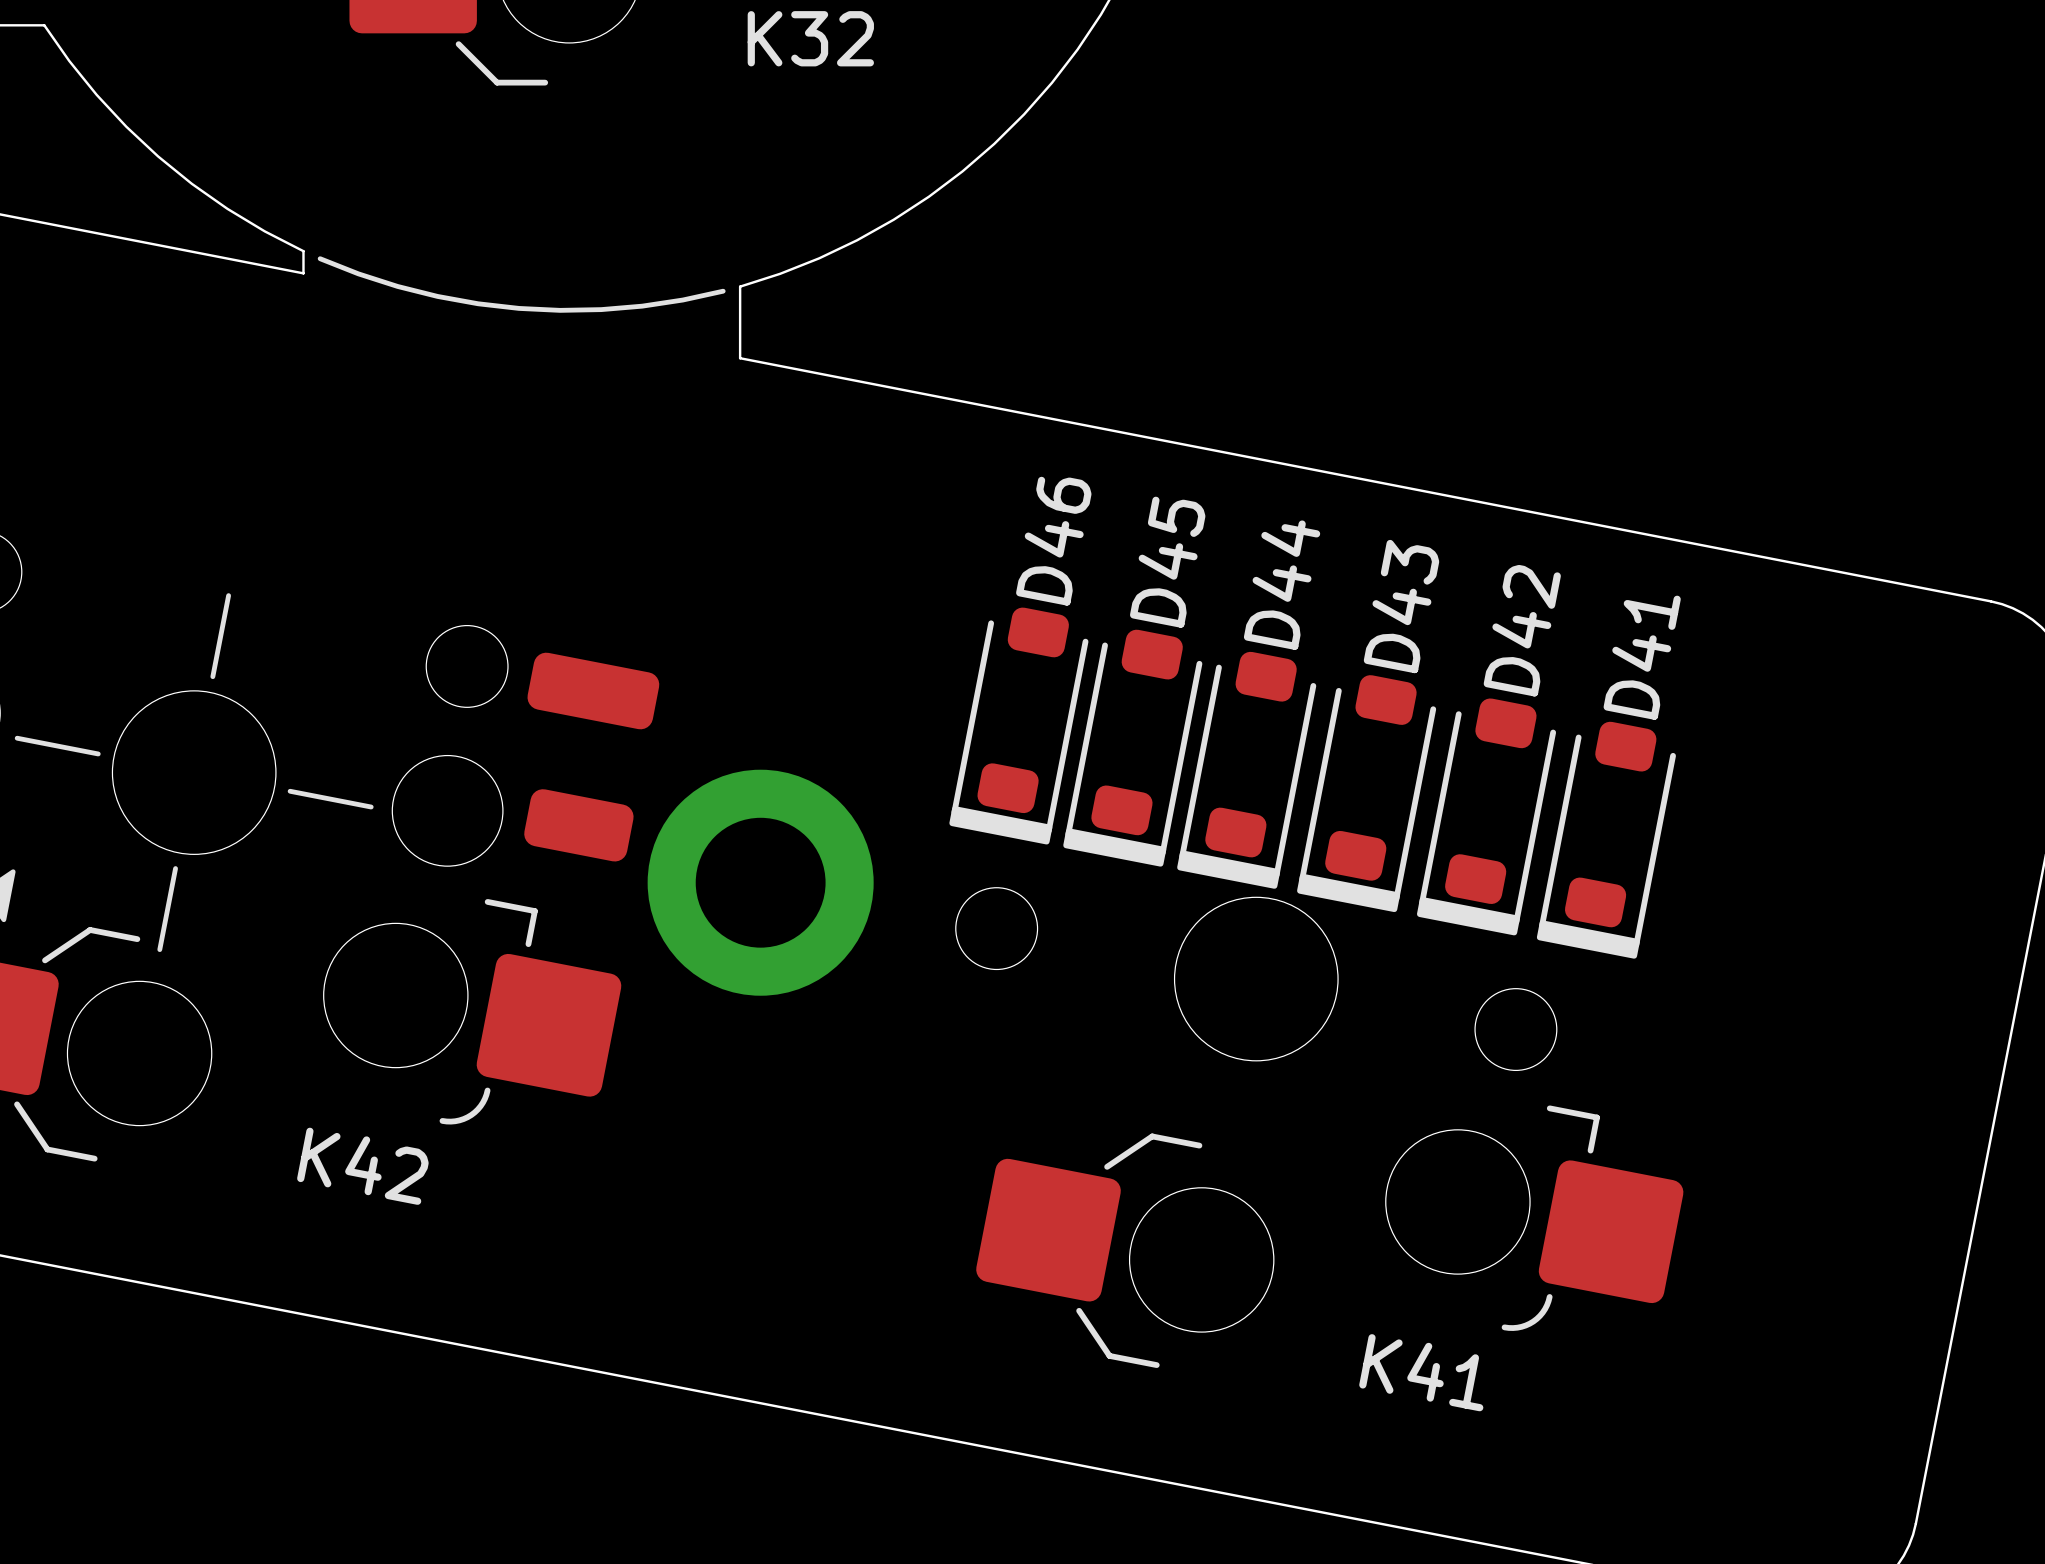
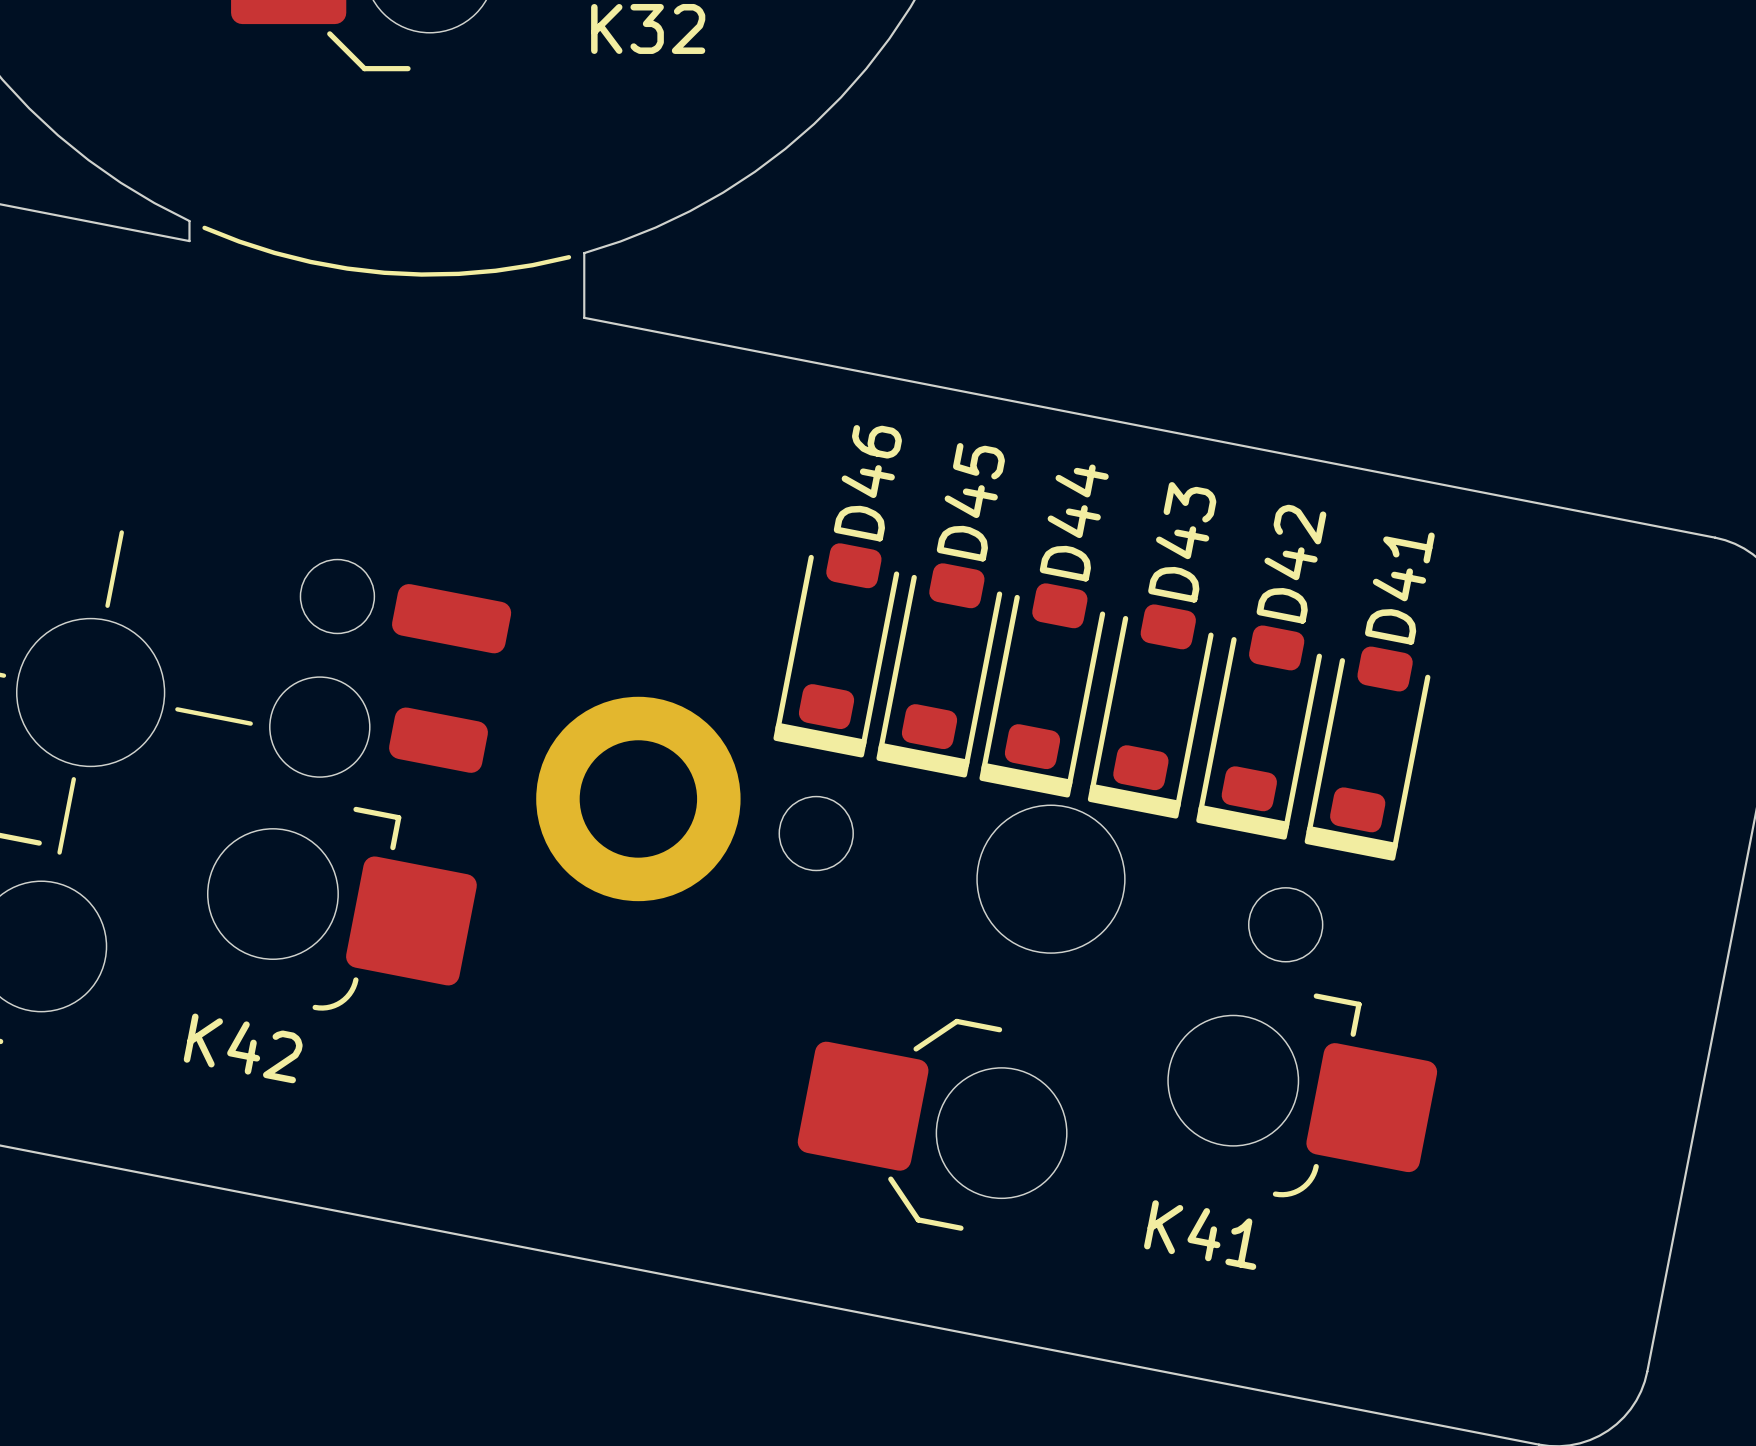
part position: (760, 882) -> (638, 798)

